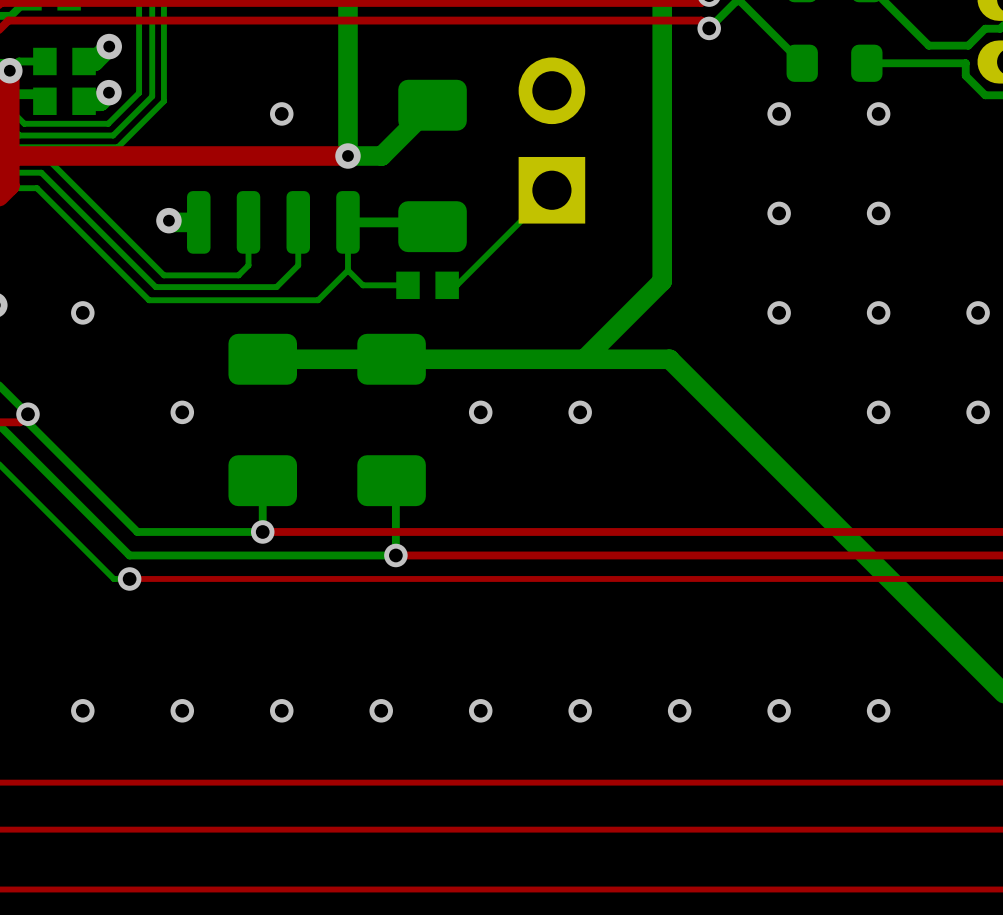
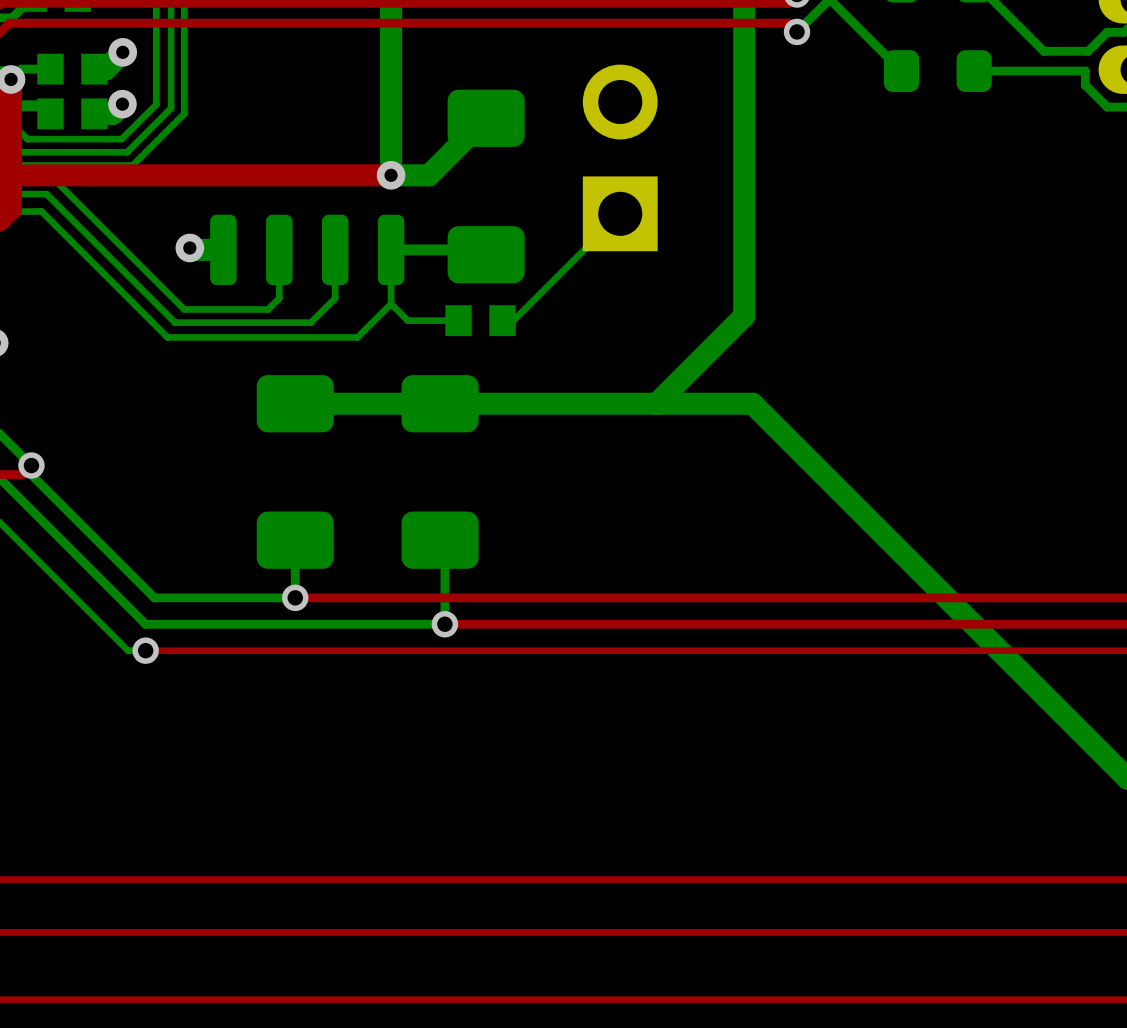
via: (281, 113) -> none
via: (779, 113) -> none
via: (878, 113) -> none
via: (779, 213) -> none
via: (878, 213) -> none
via: (82, 312) -> none
via: (779, 312) -> none
via: (878, 312) -> none
via: (978, 312) -> none
via: (182, 412) -> none
via: (480, 412) -> none
via: (580, 412) -> none
via: (878, 412) -> none
via: (978, 412) -> none
via: (82, 710) -> none
via: (182, 710) -> none
via: (281, 710) -> none
via: (381, 710) -> none
via: (480, 710) -> none
via: (580, 710) -> none
via: (679, 710) -> none
via: (779, 710) -> none
via: (878, 710) -> none

